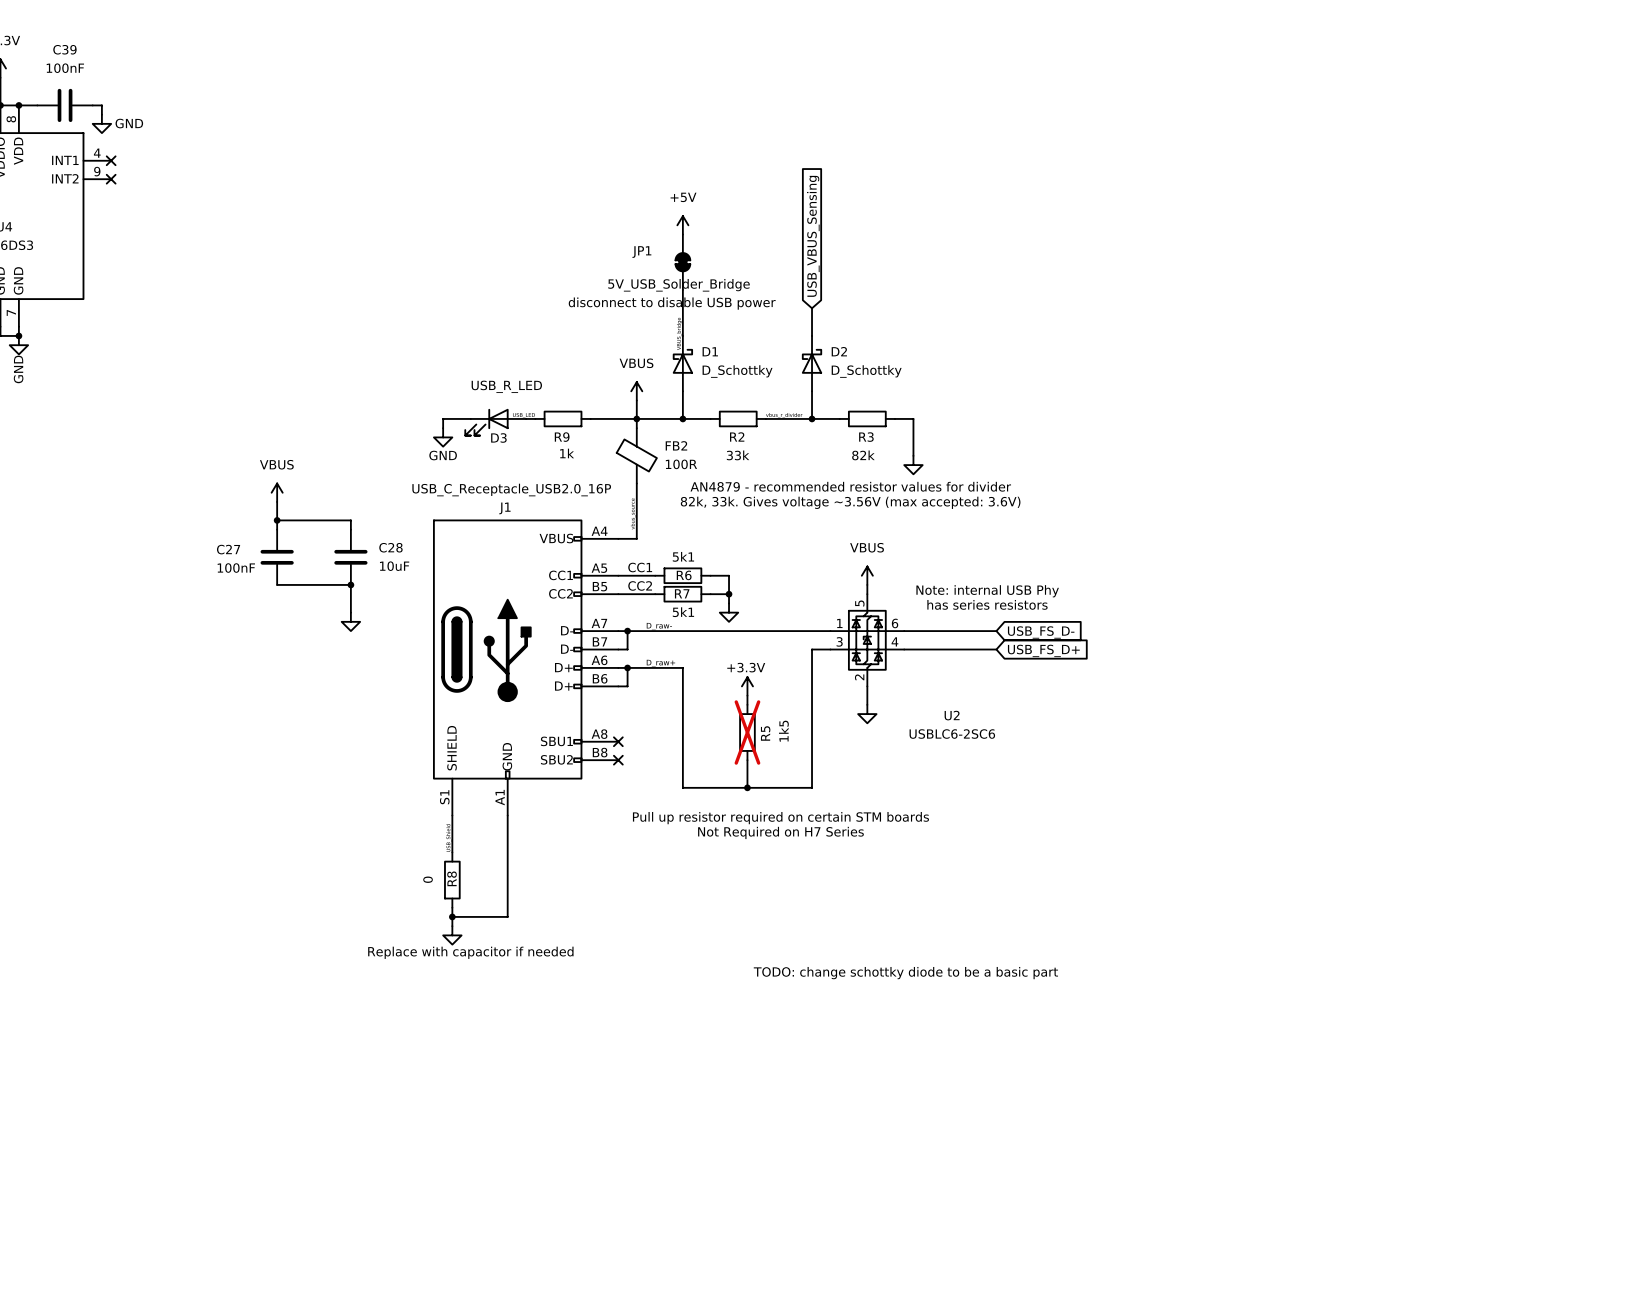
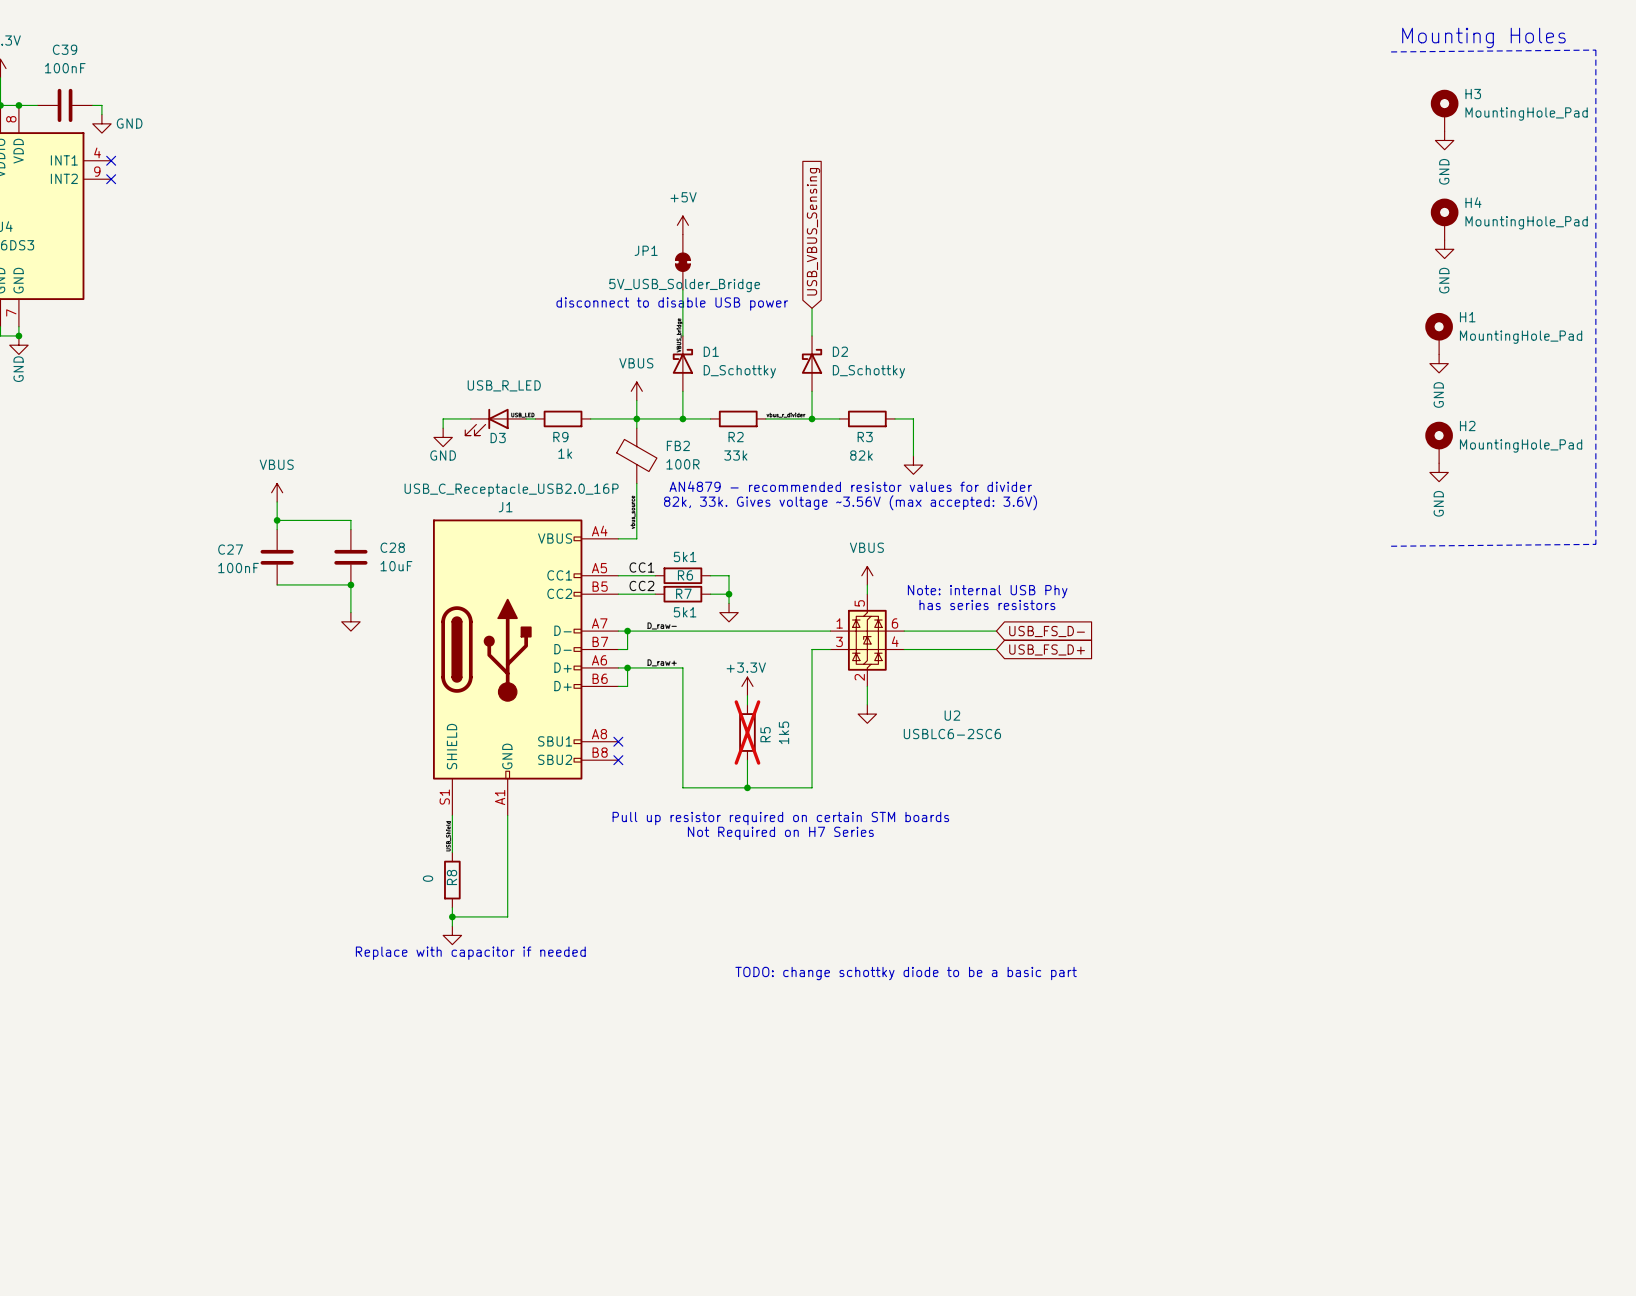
text: none -> Mounting Holes (1483, 37)
line: none -> (1391, 51) (1595, 50) (1595, 544) (1391, 546)
H3: none -> MountingHole_Pad (1444, 110)
power symbol: none -> GND (1444, 140)
H4: none -> MountingHole_Pad (1444, 219)
power symbol: none -> GND (1444, 249)
H1: none -> MountingHole_Pad (1439, 333)
power symbol: none -> GND (1439, 363)
H2: none -> MountingHole_Pad (1439, 442)
power symbol: none -> GND (1439, 472)

